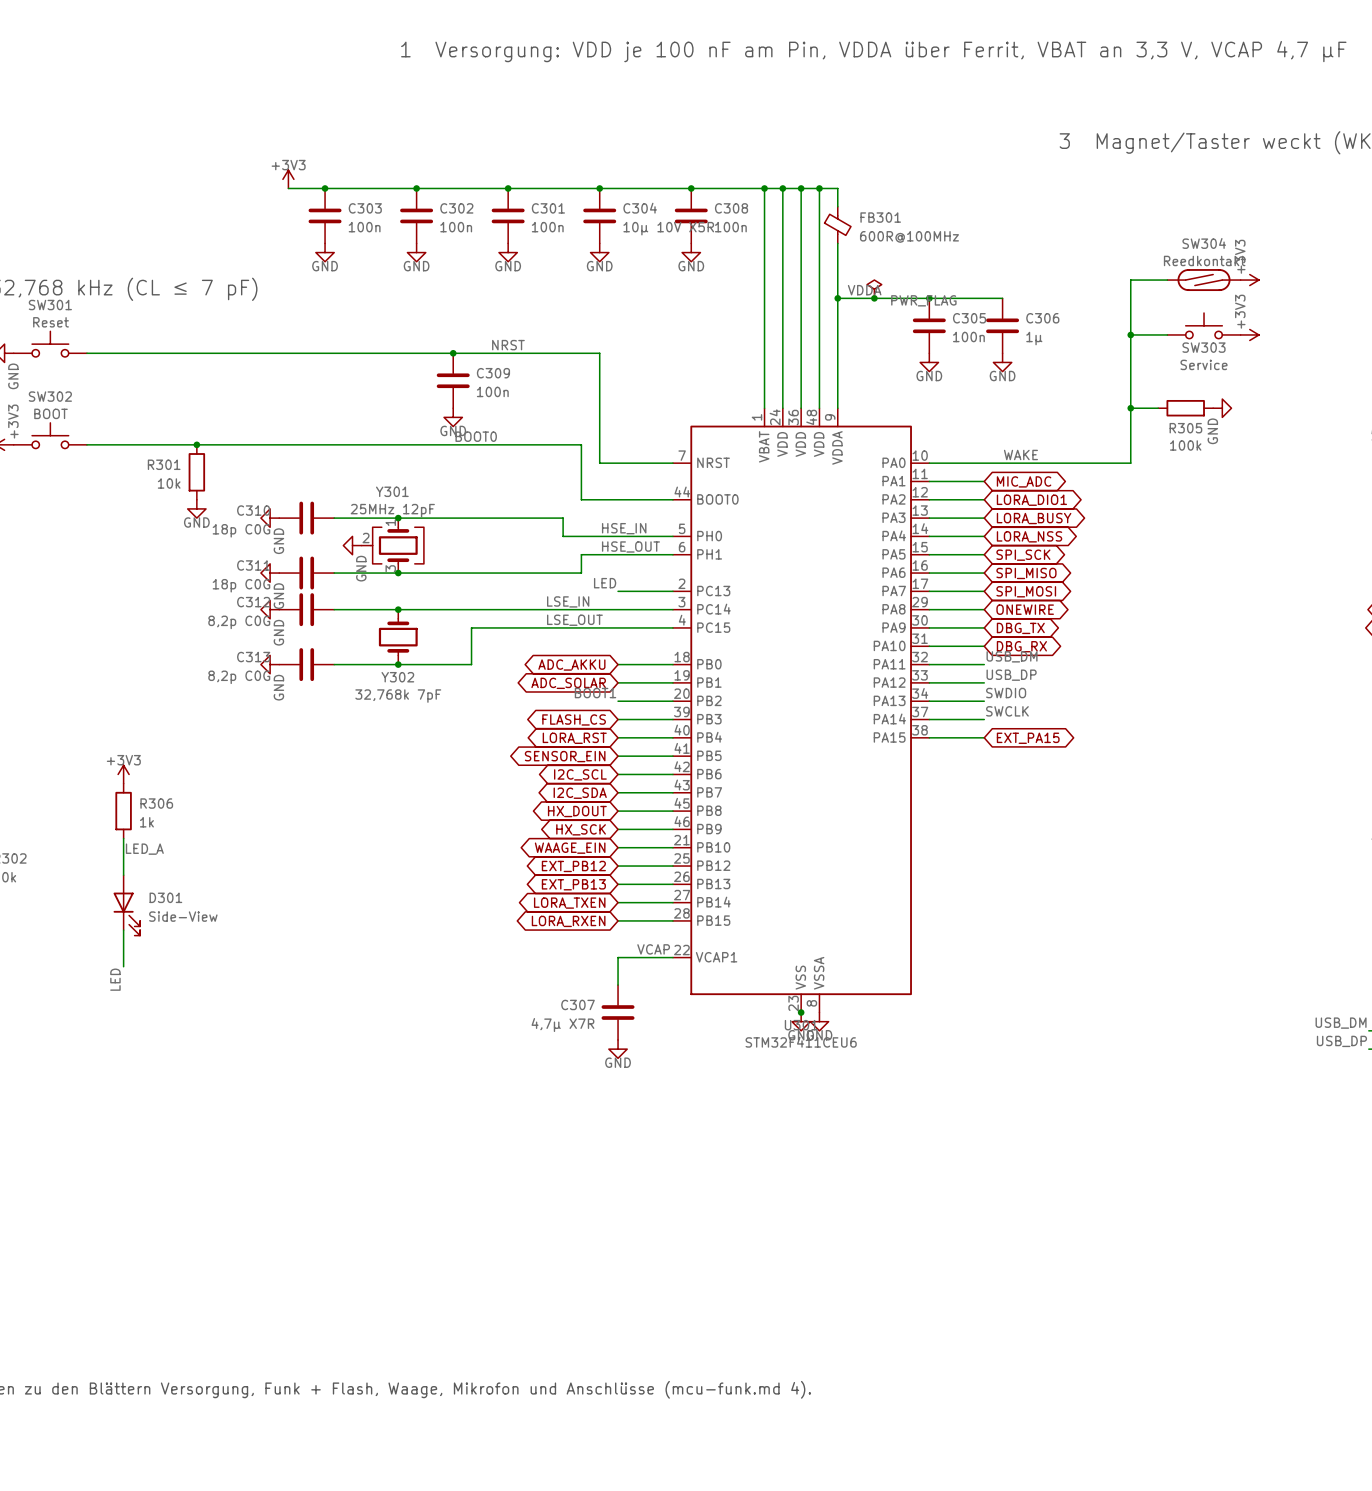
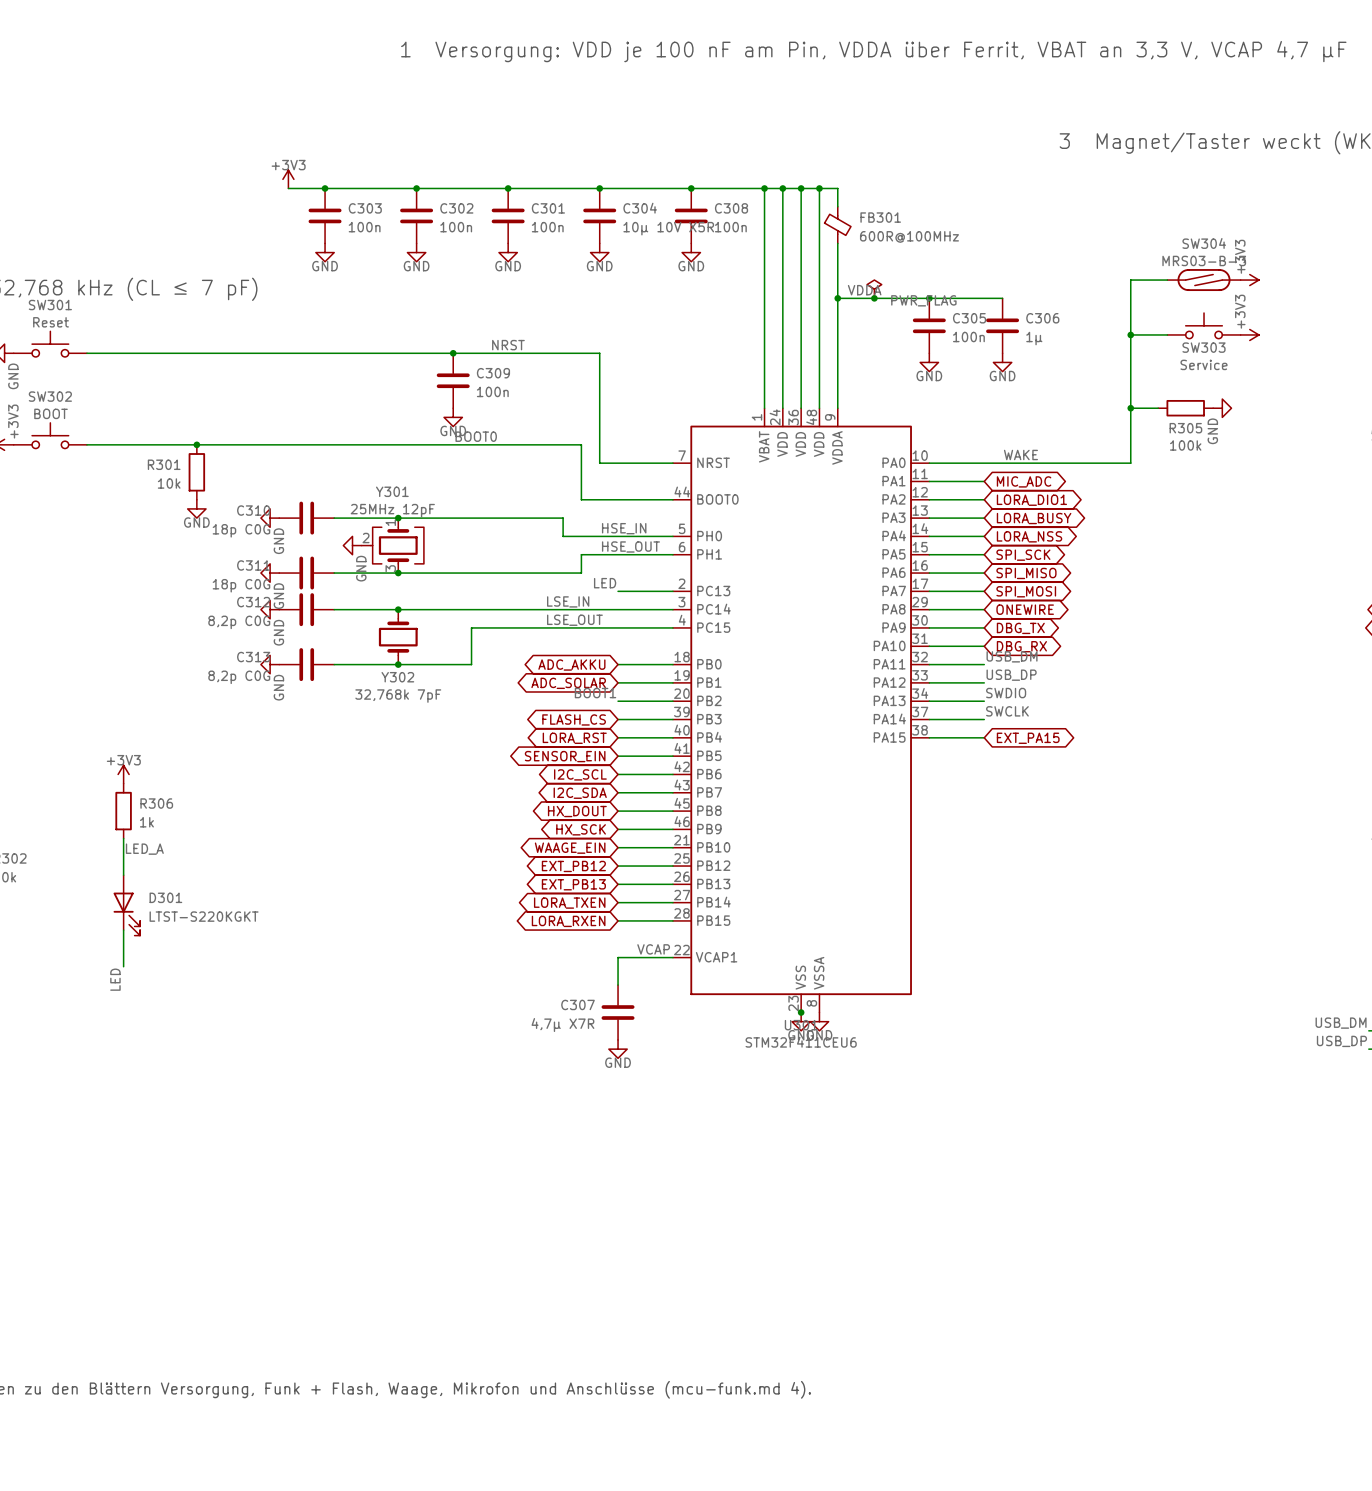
SW304 value: Reedkontakt (1204, 260) -> MRS03-B-3 (1204, 260)
D301 value: Side-View (183, 916) -> LTST-S220KGKT (204, 916)

